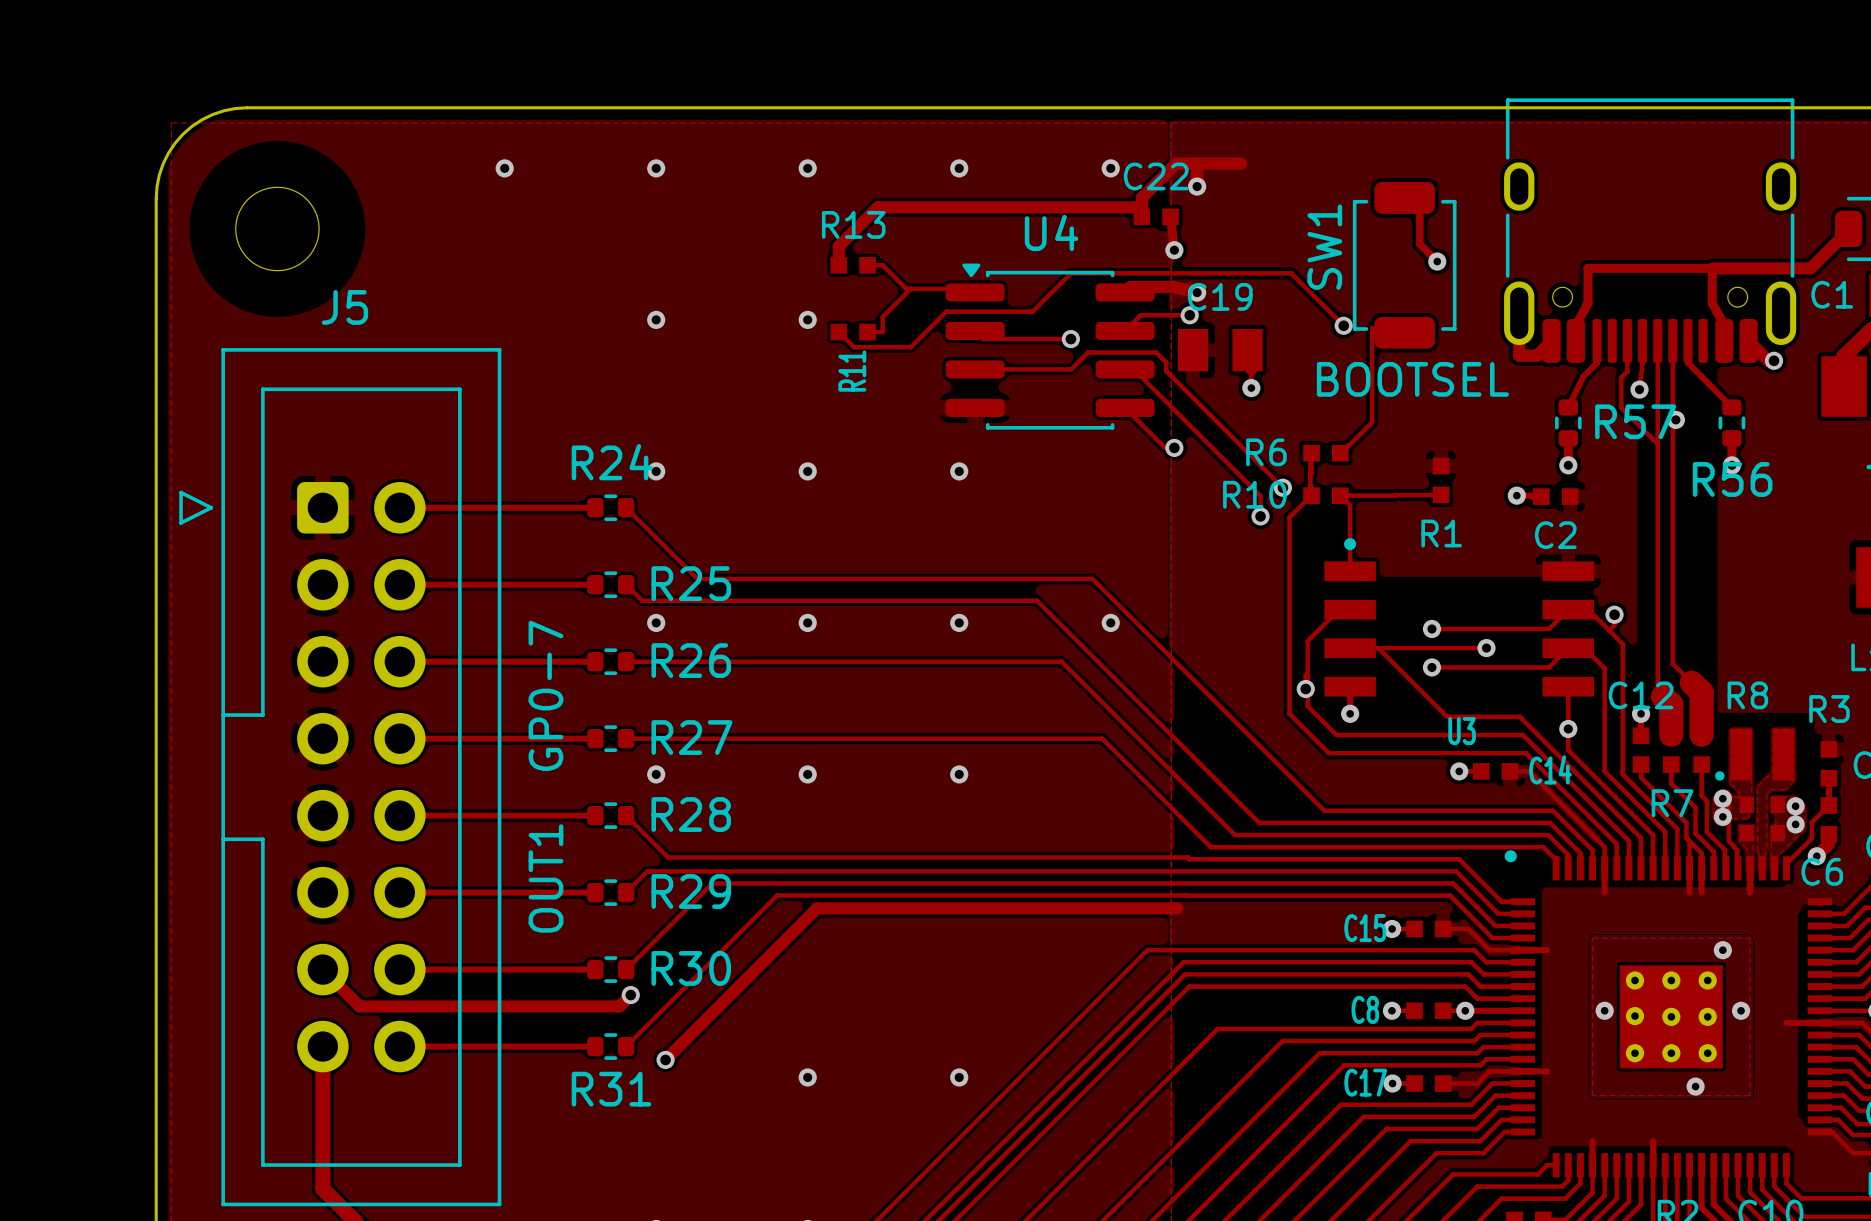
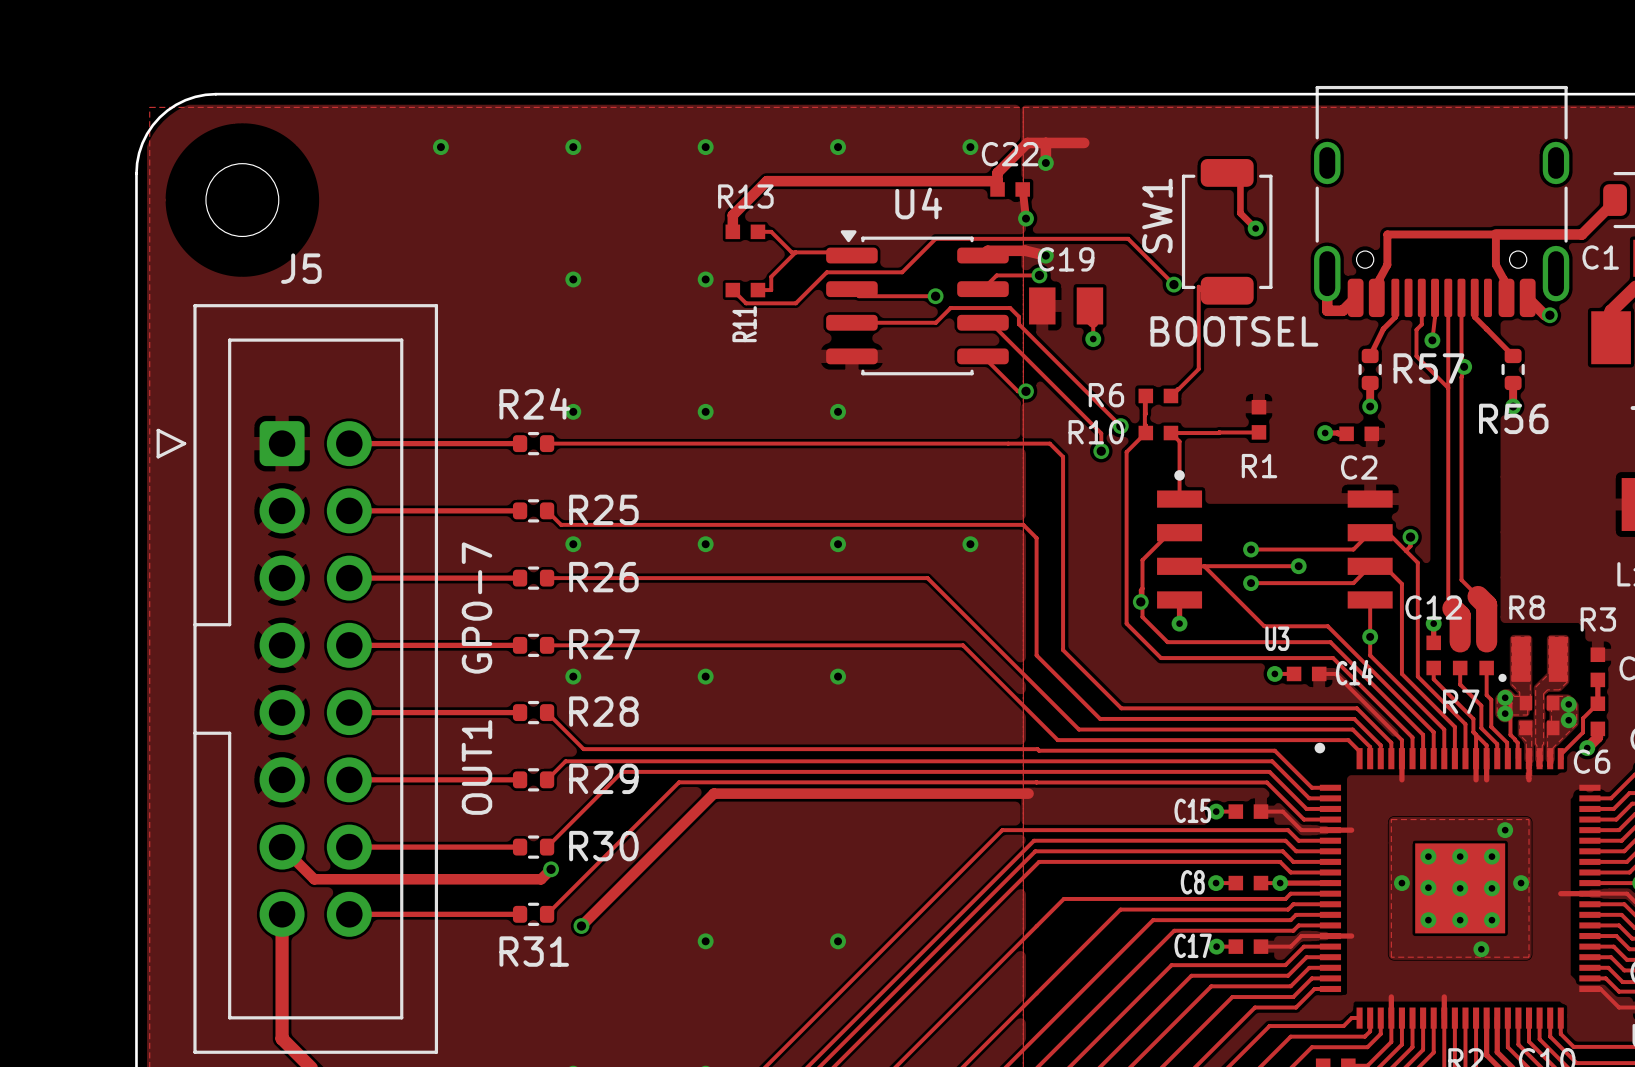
track: (626, 507) (697, 578) (1092, 578) (1324, 810) -> (547, 443) (1049, 443) (1063, 456) (1063, 650) (1121, 708) (1157, 708)
track: (1037, 600) (1186, 750) -> (906, 524) (1023, 524) (1036, 538) (1036, 655)

